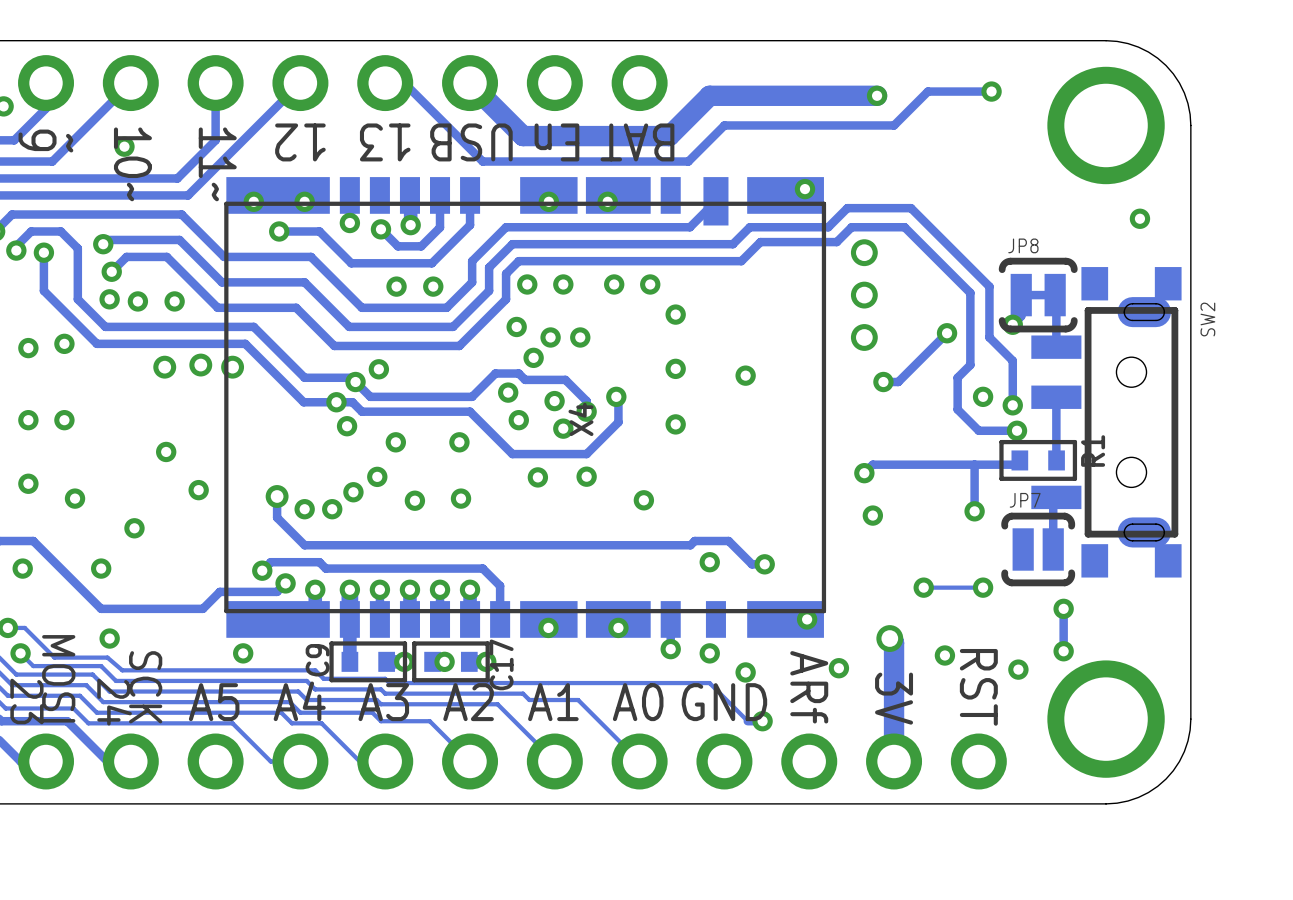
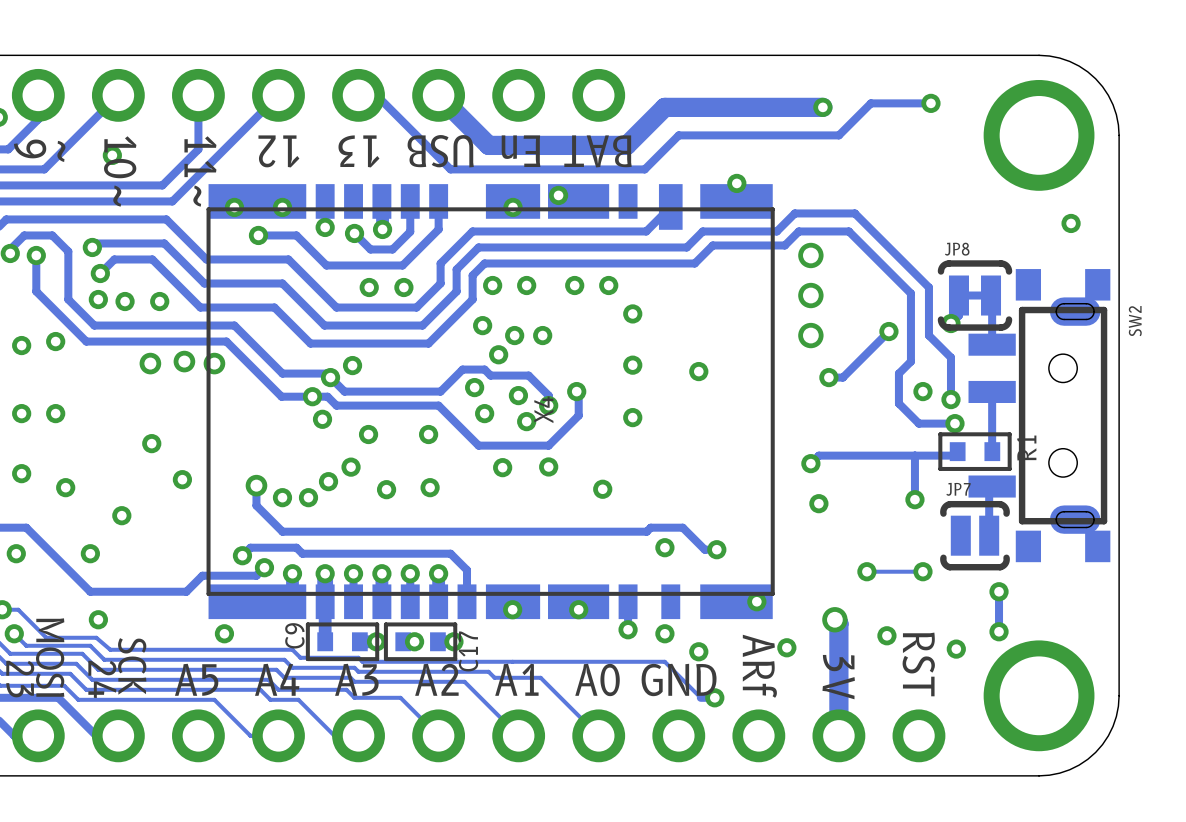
via position: (805, 189) -> (736, 183)
via position: (607, 201) -> (558, 195)

